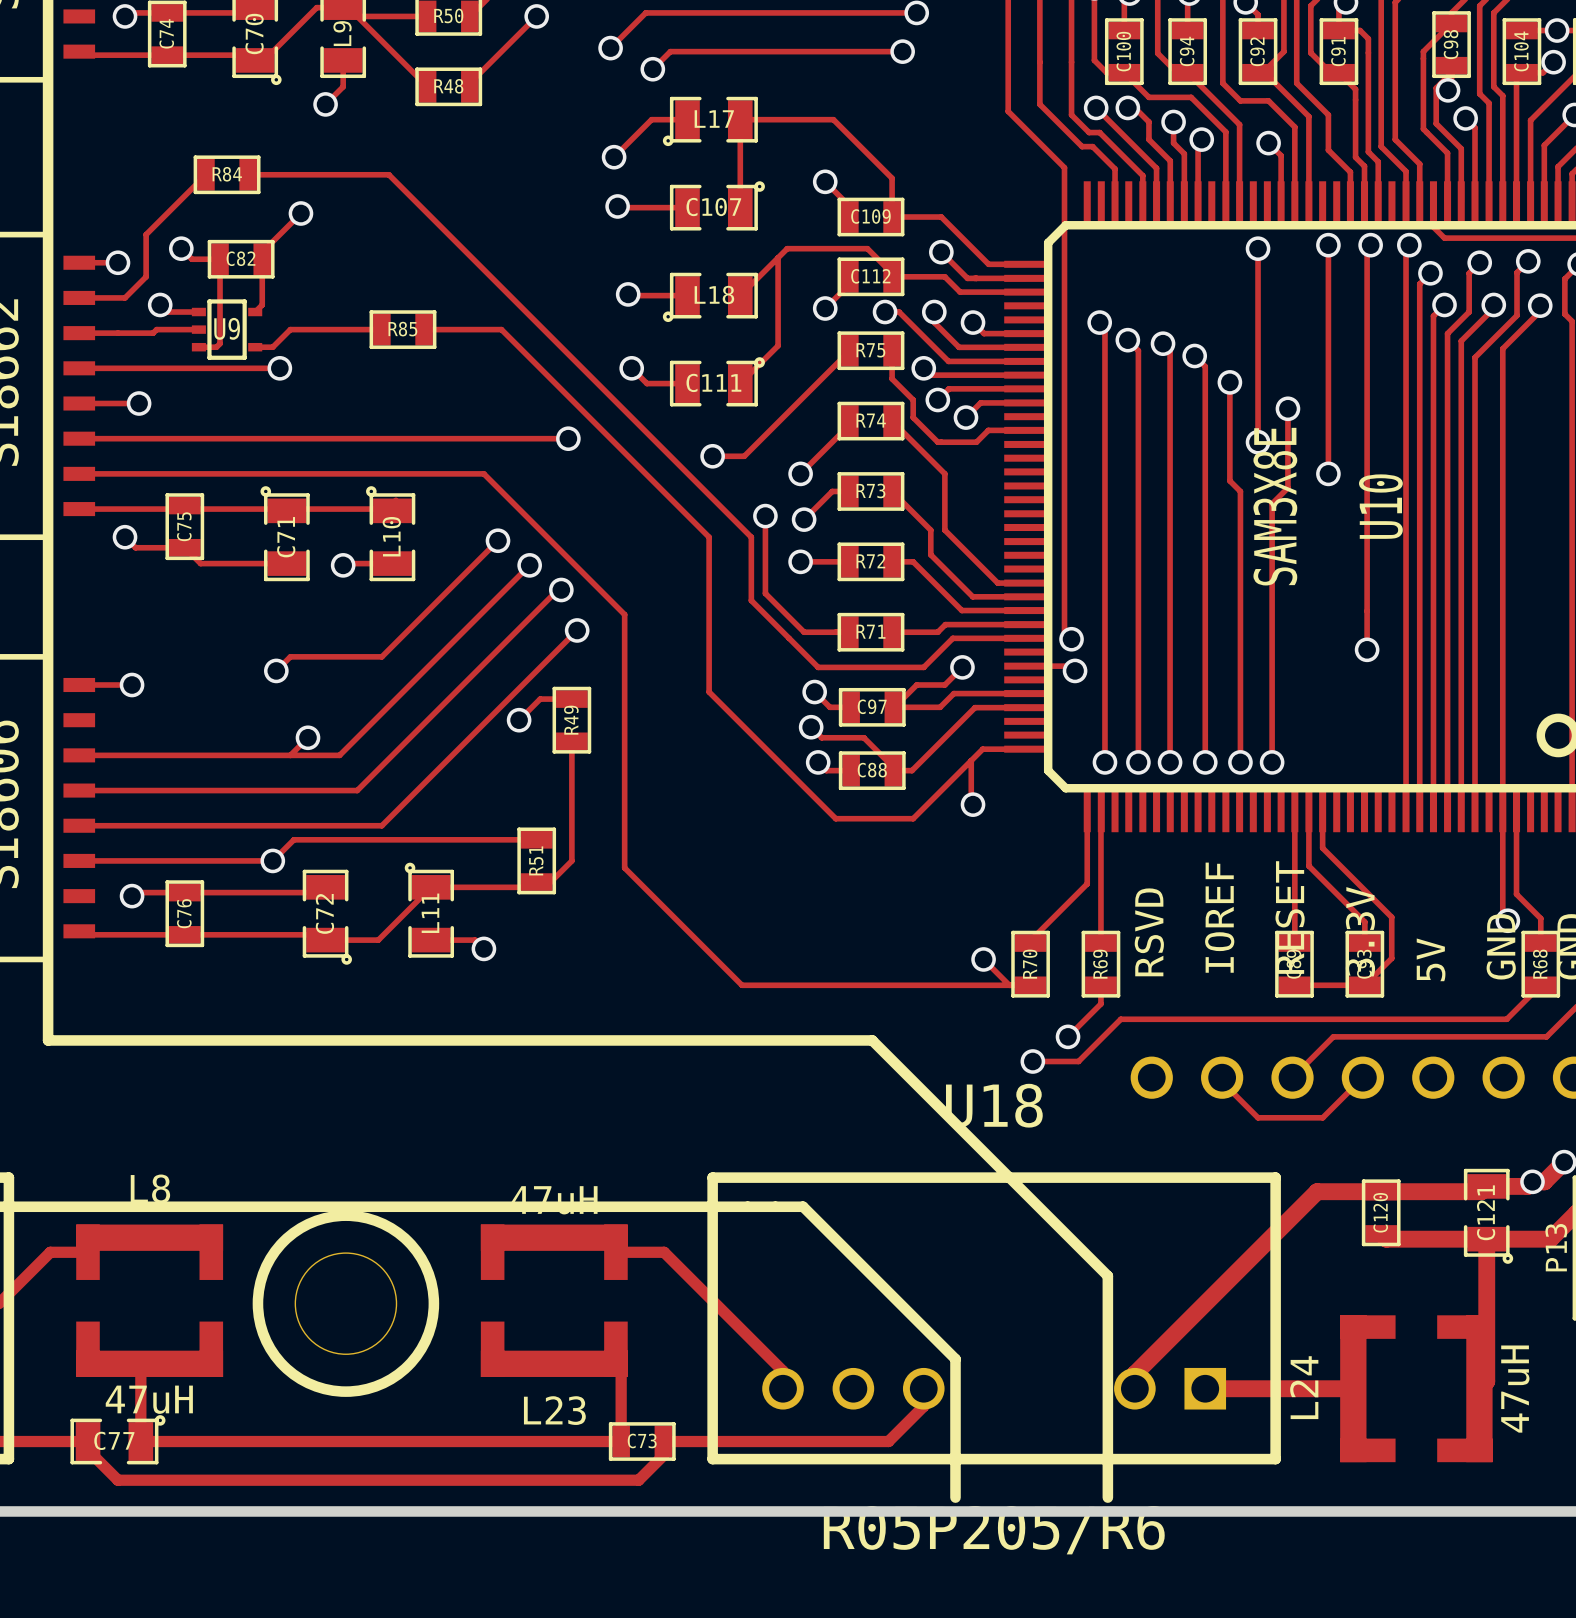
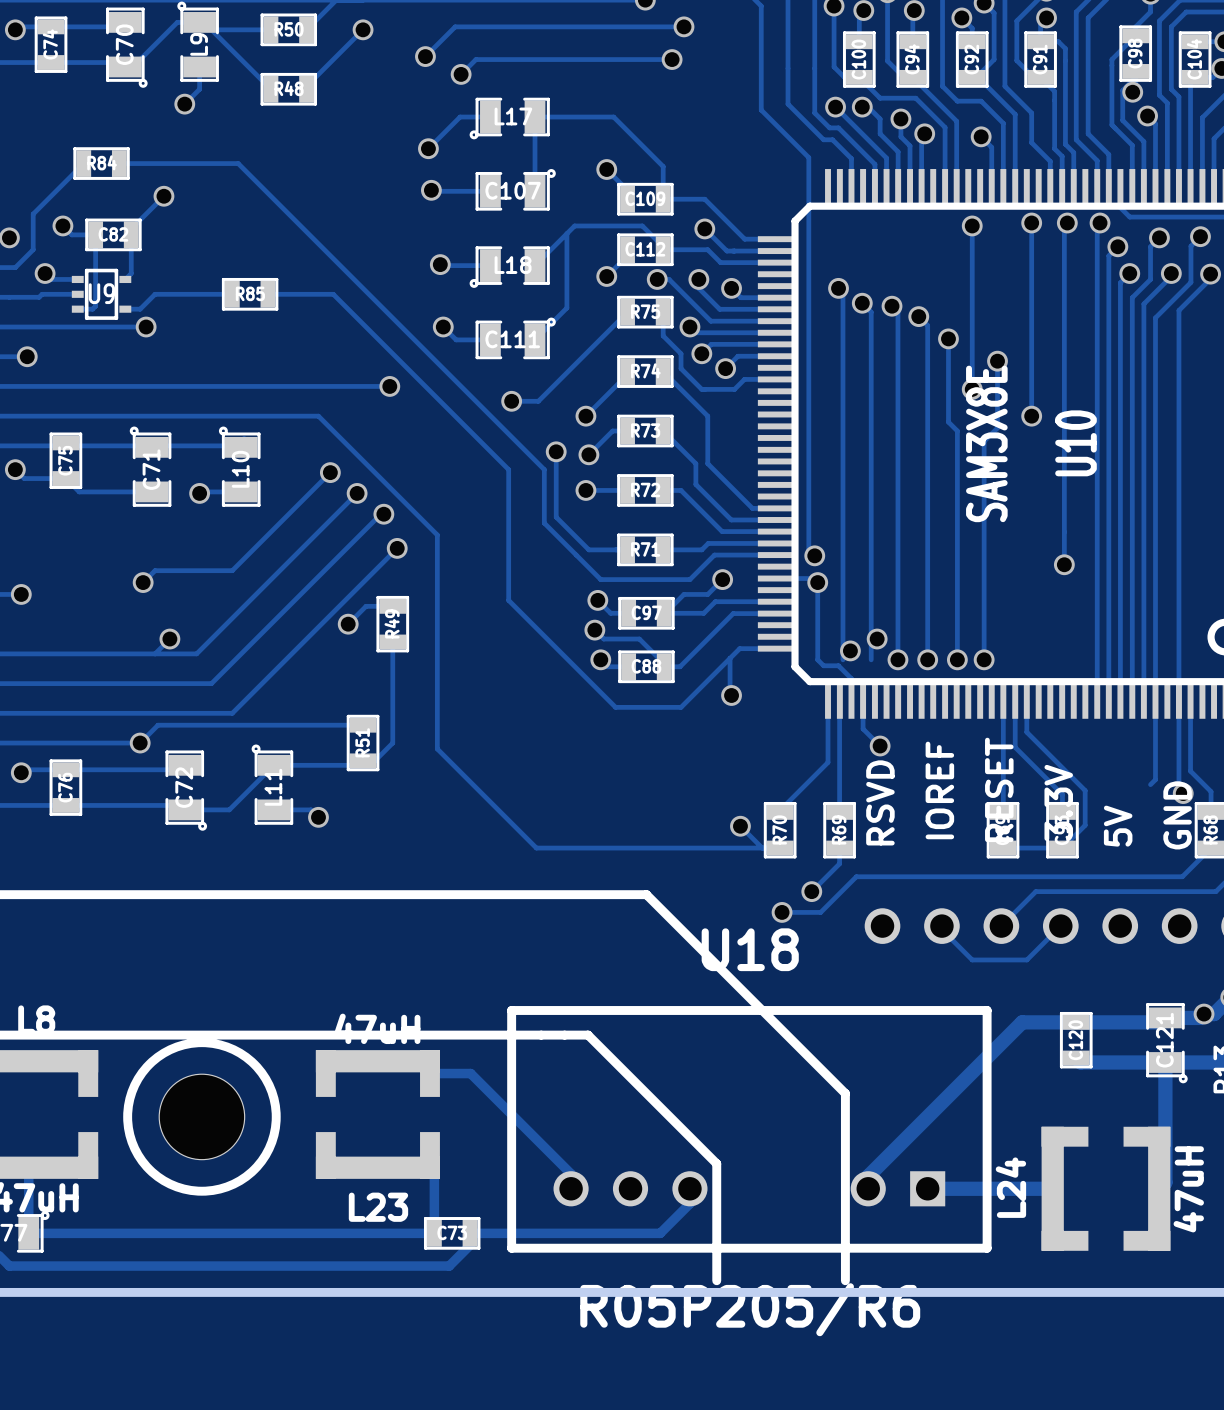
track: none -> (817, 582) (817, 659) (823, 665) (838, 665) (851, 678) (851, 700)
via: none -> (877, 639)
via: none -> (850, 650)
via: (1104, 762) -> none
via: (1138, 762) -> none
track: none -> (863, 700) (863, 728) (880, 746)
track: none -> (1155, 700) (1155, 779) (1150, 784)
via: none -> (880, 746)

